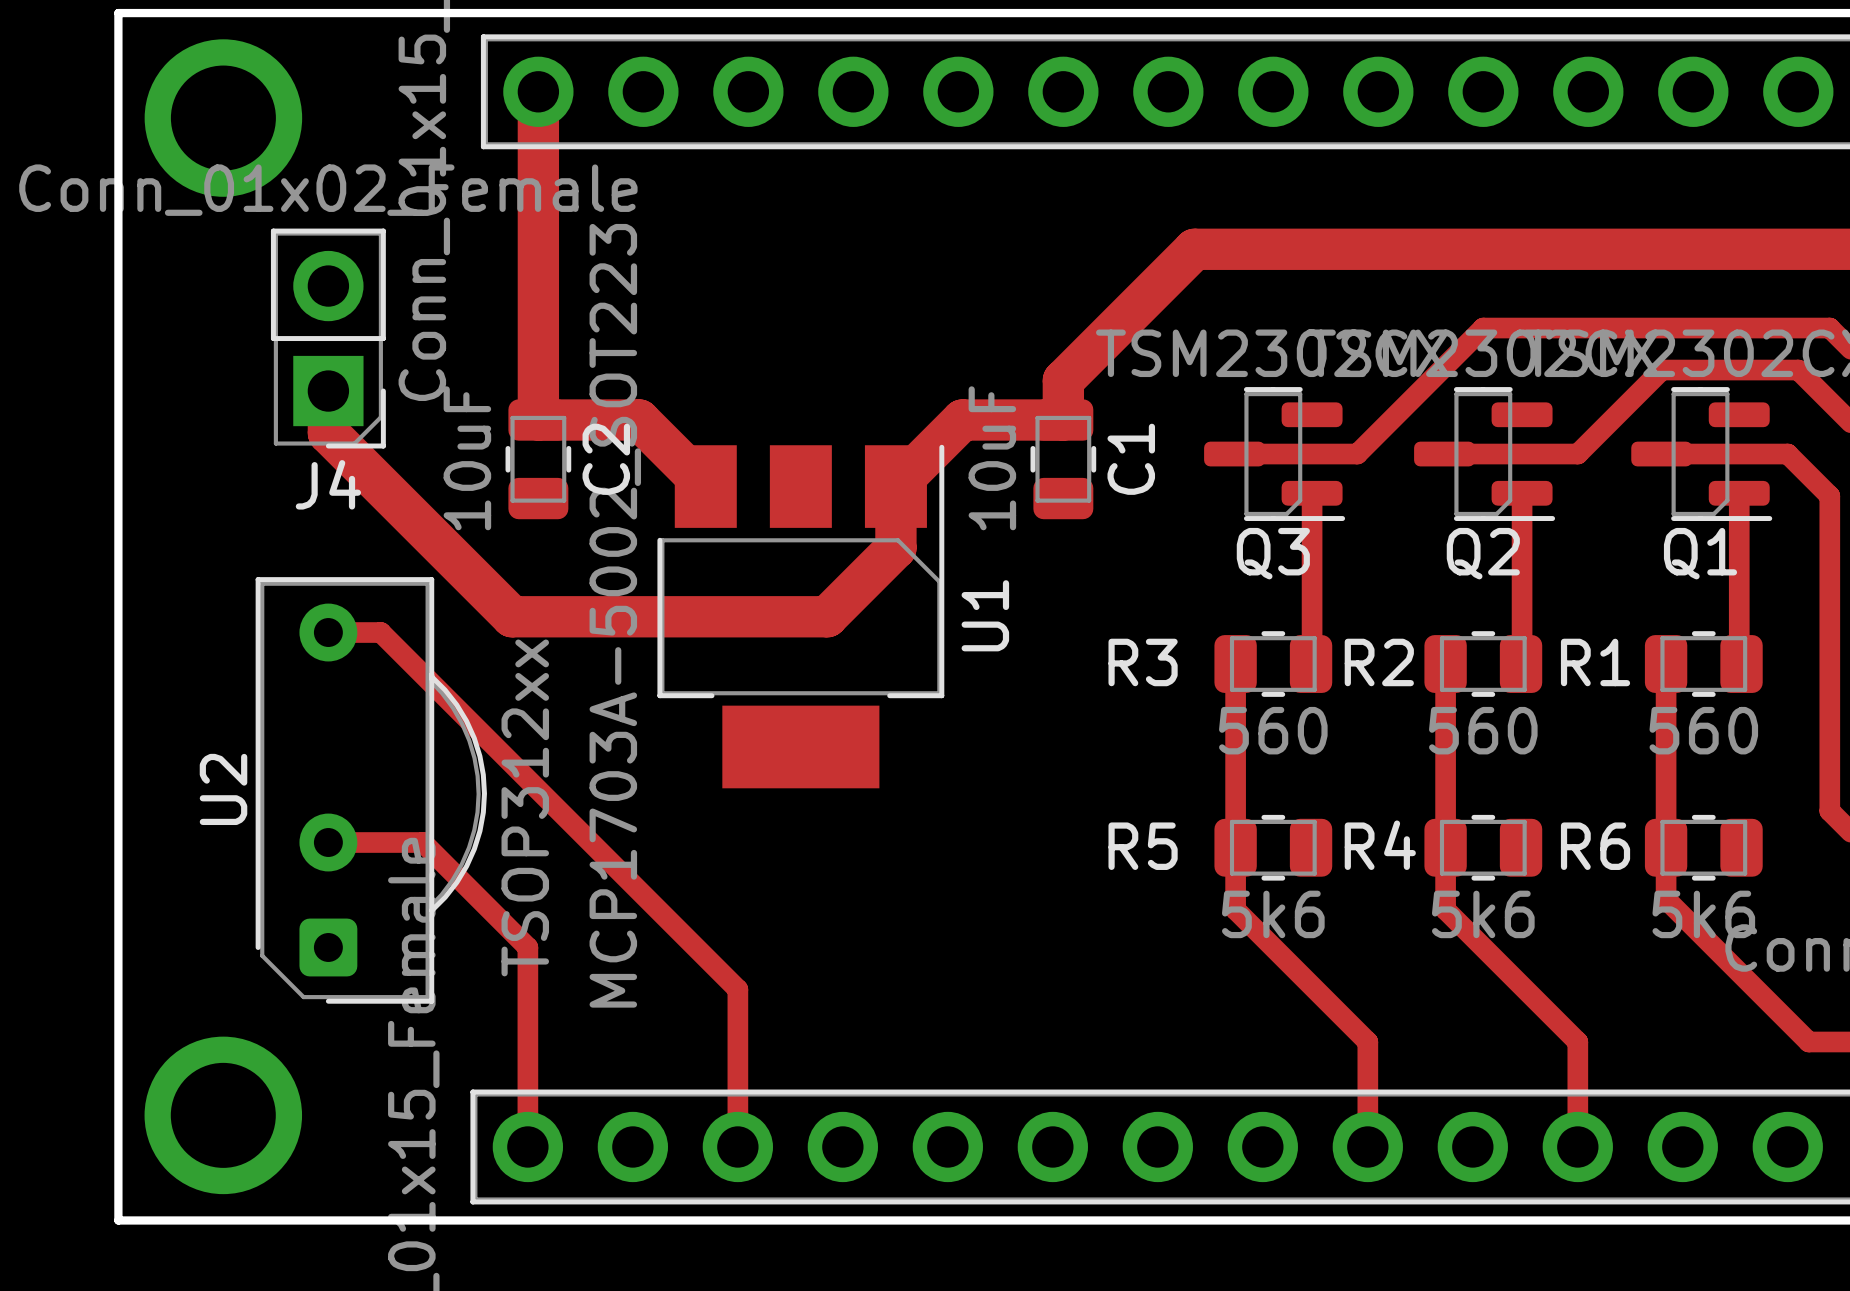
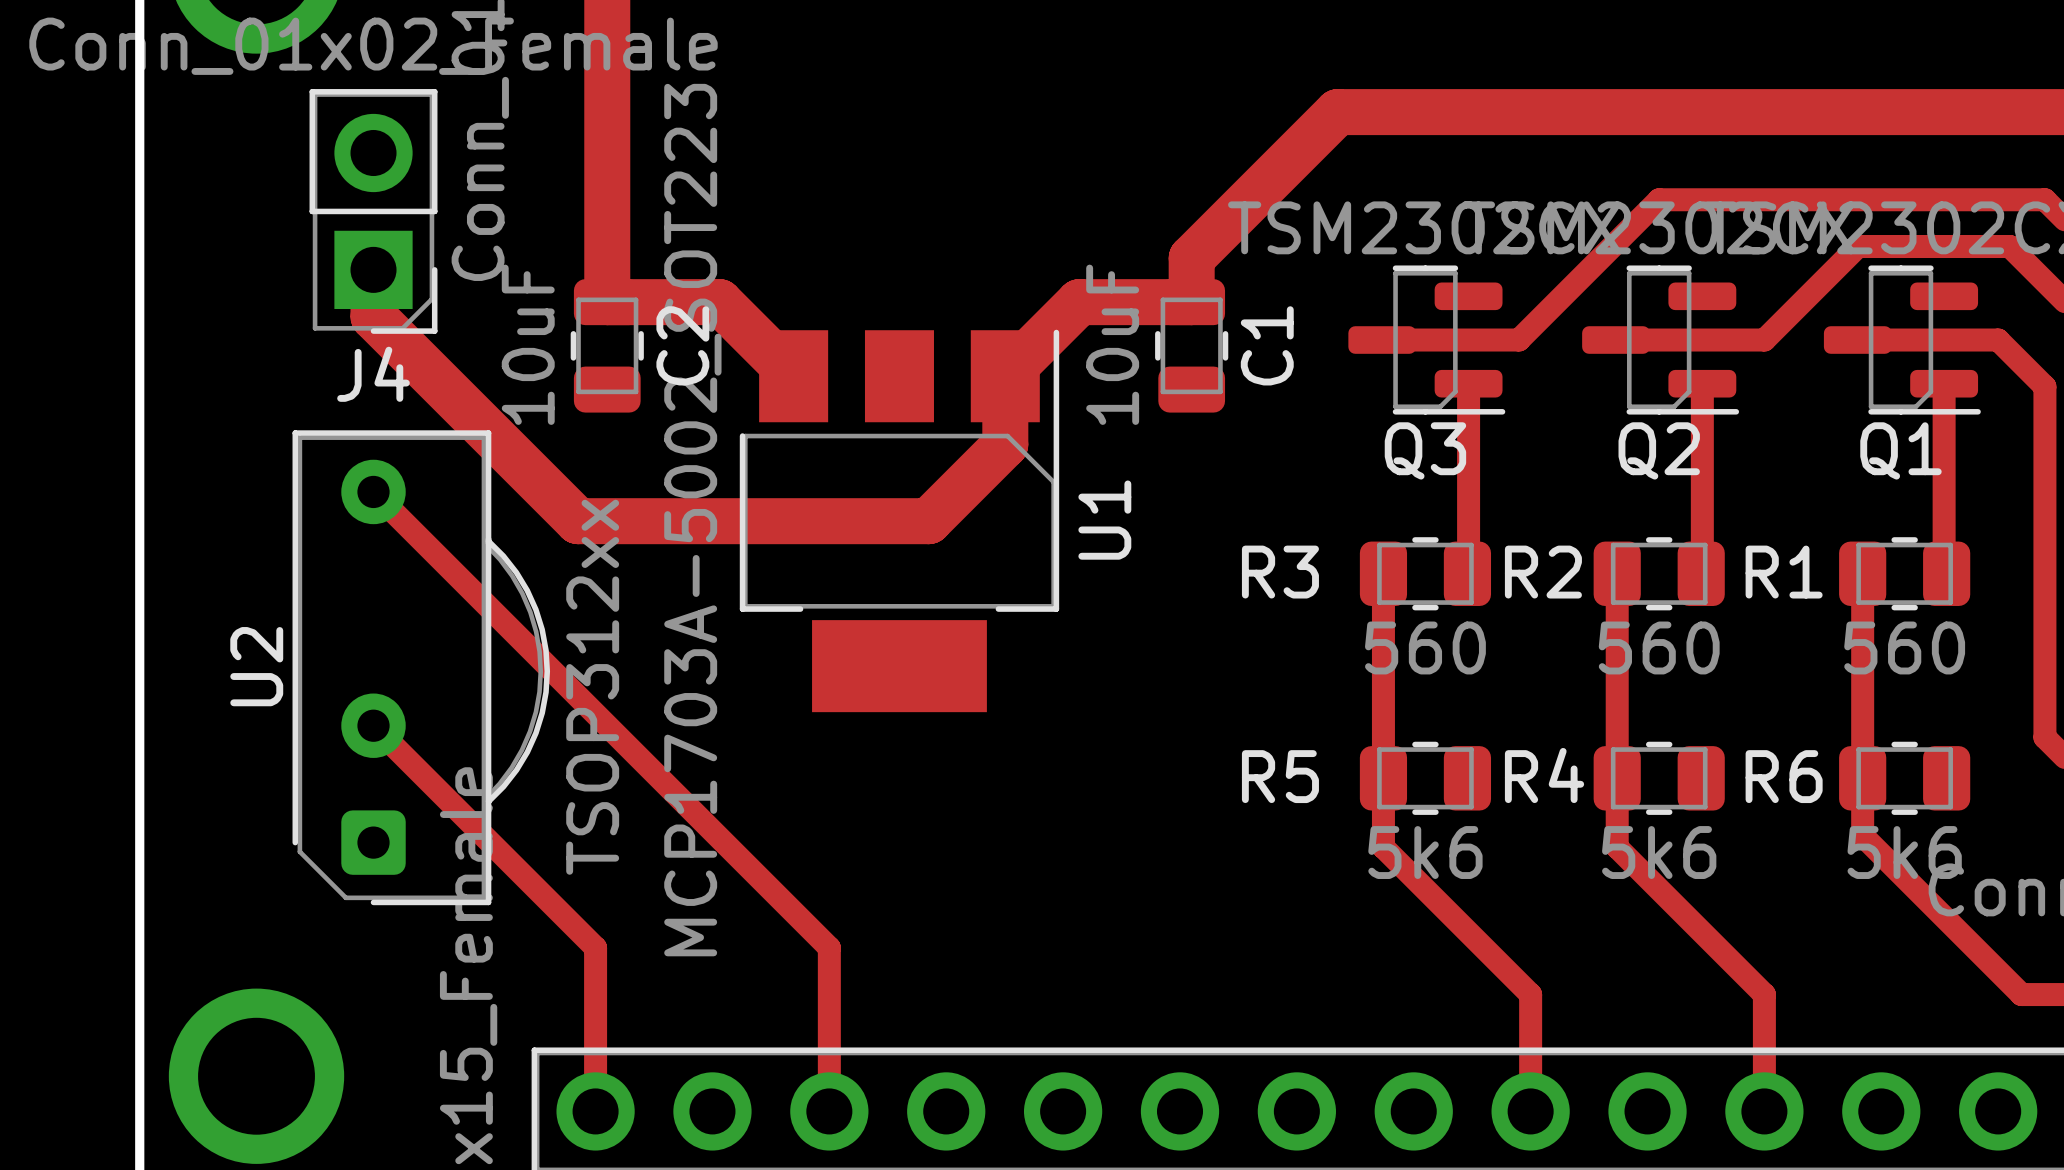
top track: (328, 632) (380, 632) (737, 989) (737, 999) -> (373, 491) (829, 947)
U2 position: (371, 790) -> (421, 667)
top track: (328, 842) (422, 842) (527, 947) (527, 999) -> (373, 725) (595, 947)

